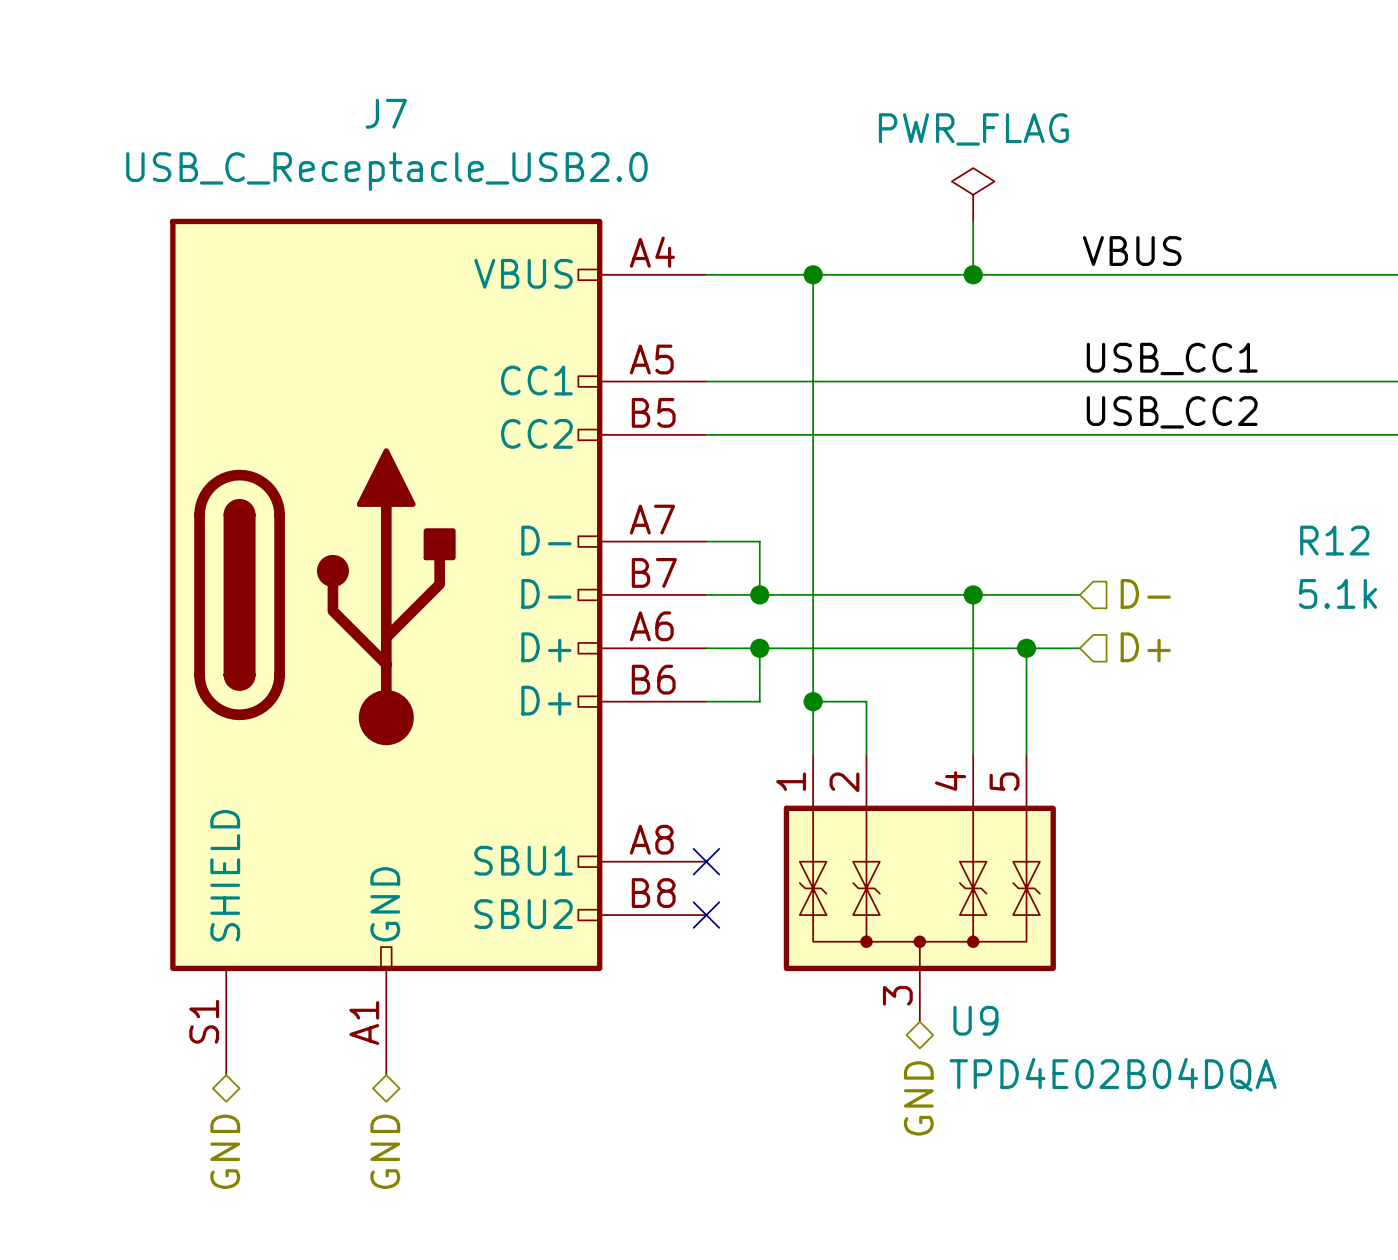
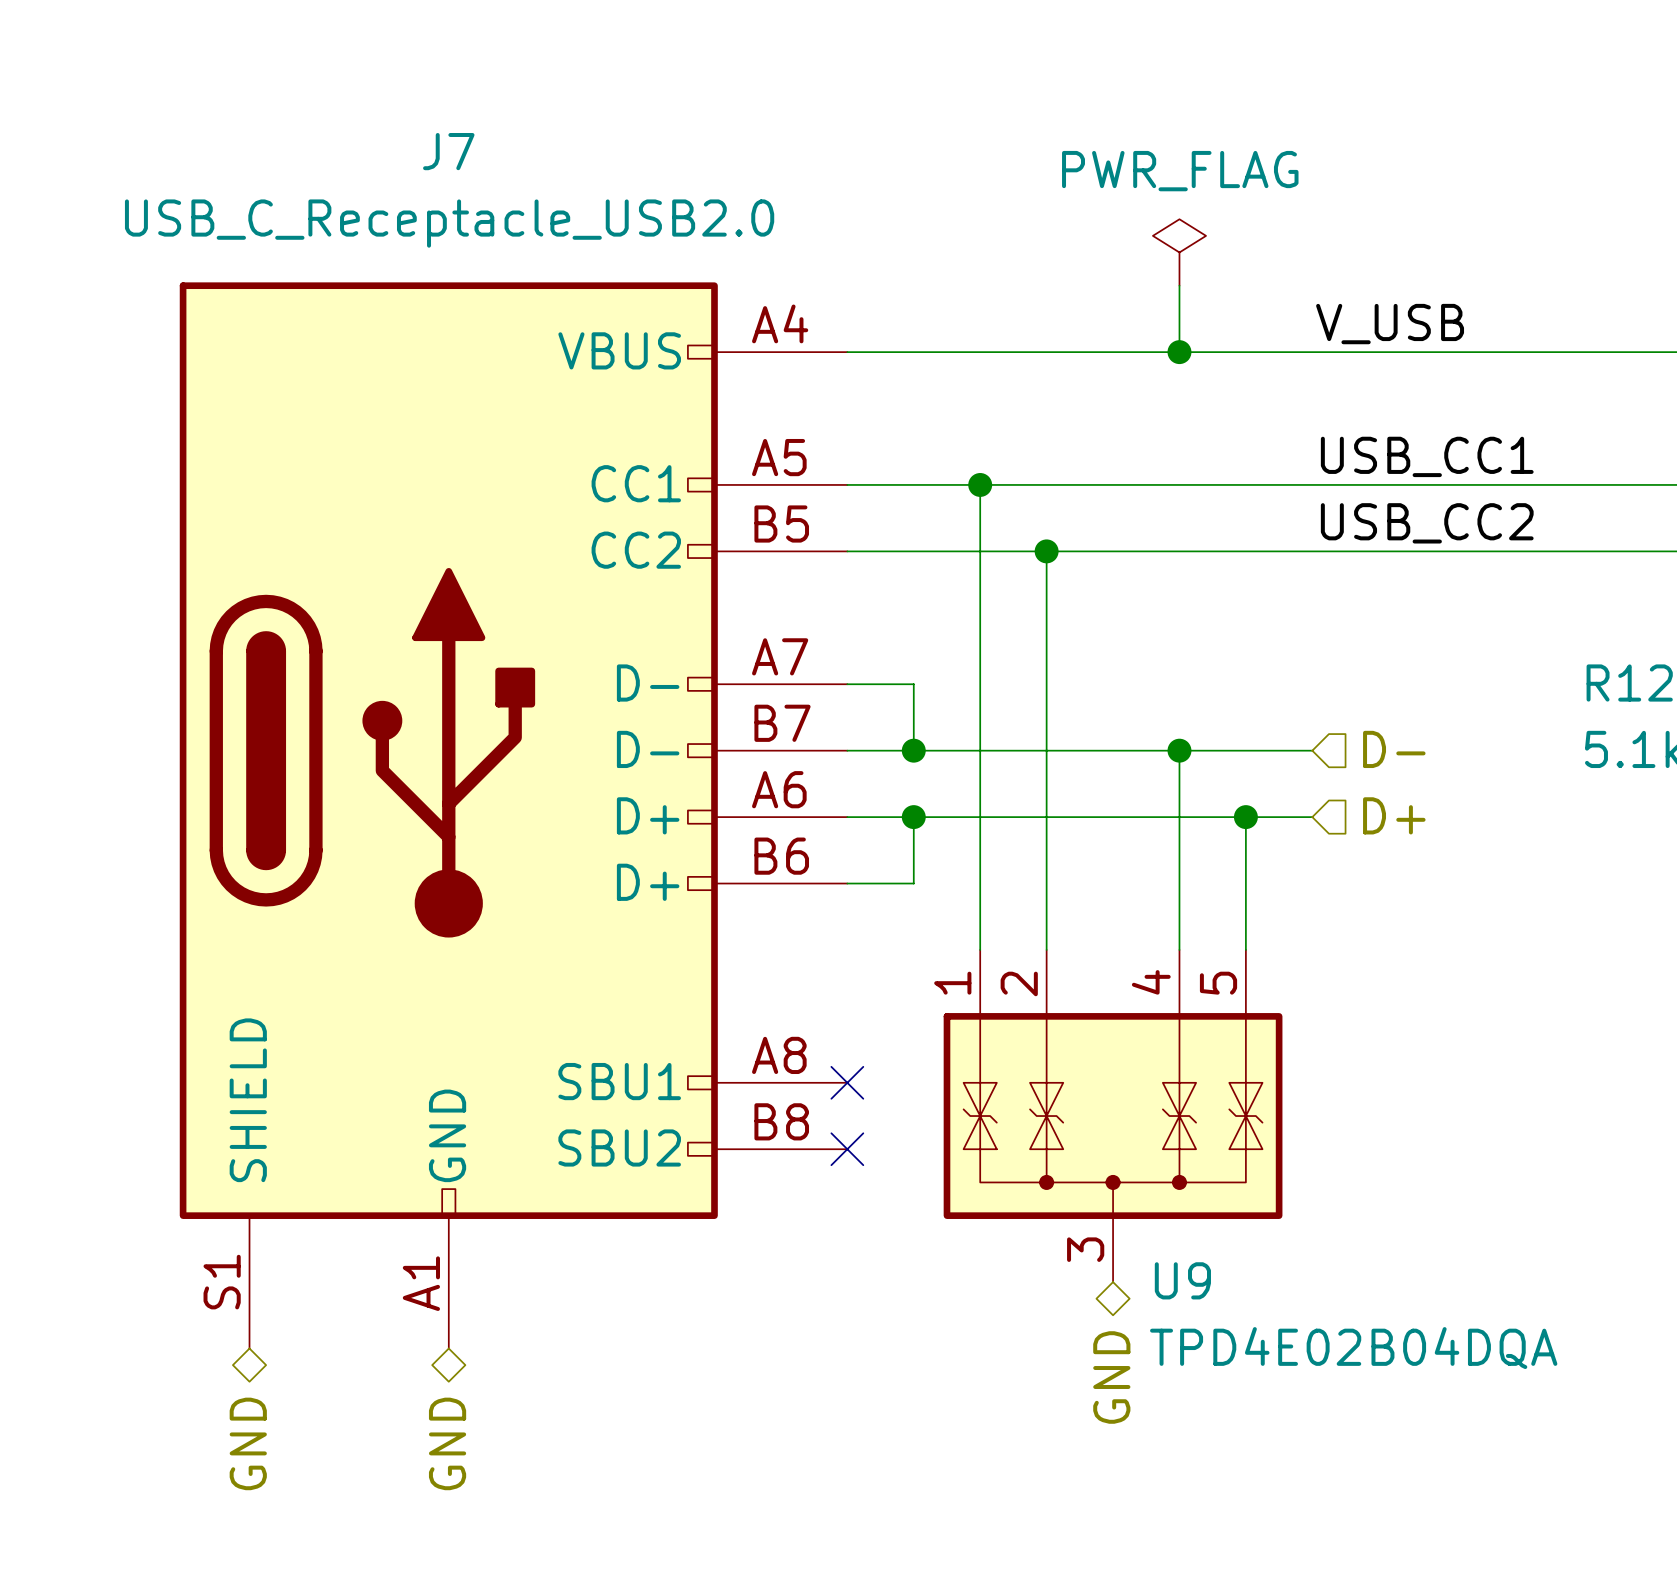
label: VBUS (1132, 251) -> V_USB (1390, 324)
wire: (813, 274) (813, 381) -> none
junction: (813, 274) -> none
junction: none -> (980, 484)
junction: none -> (1046, 551)
wire: (813, 701) (866, 701) -> (1046, 551) (1046, 883)
junction: (813, 701) -> none

